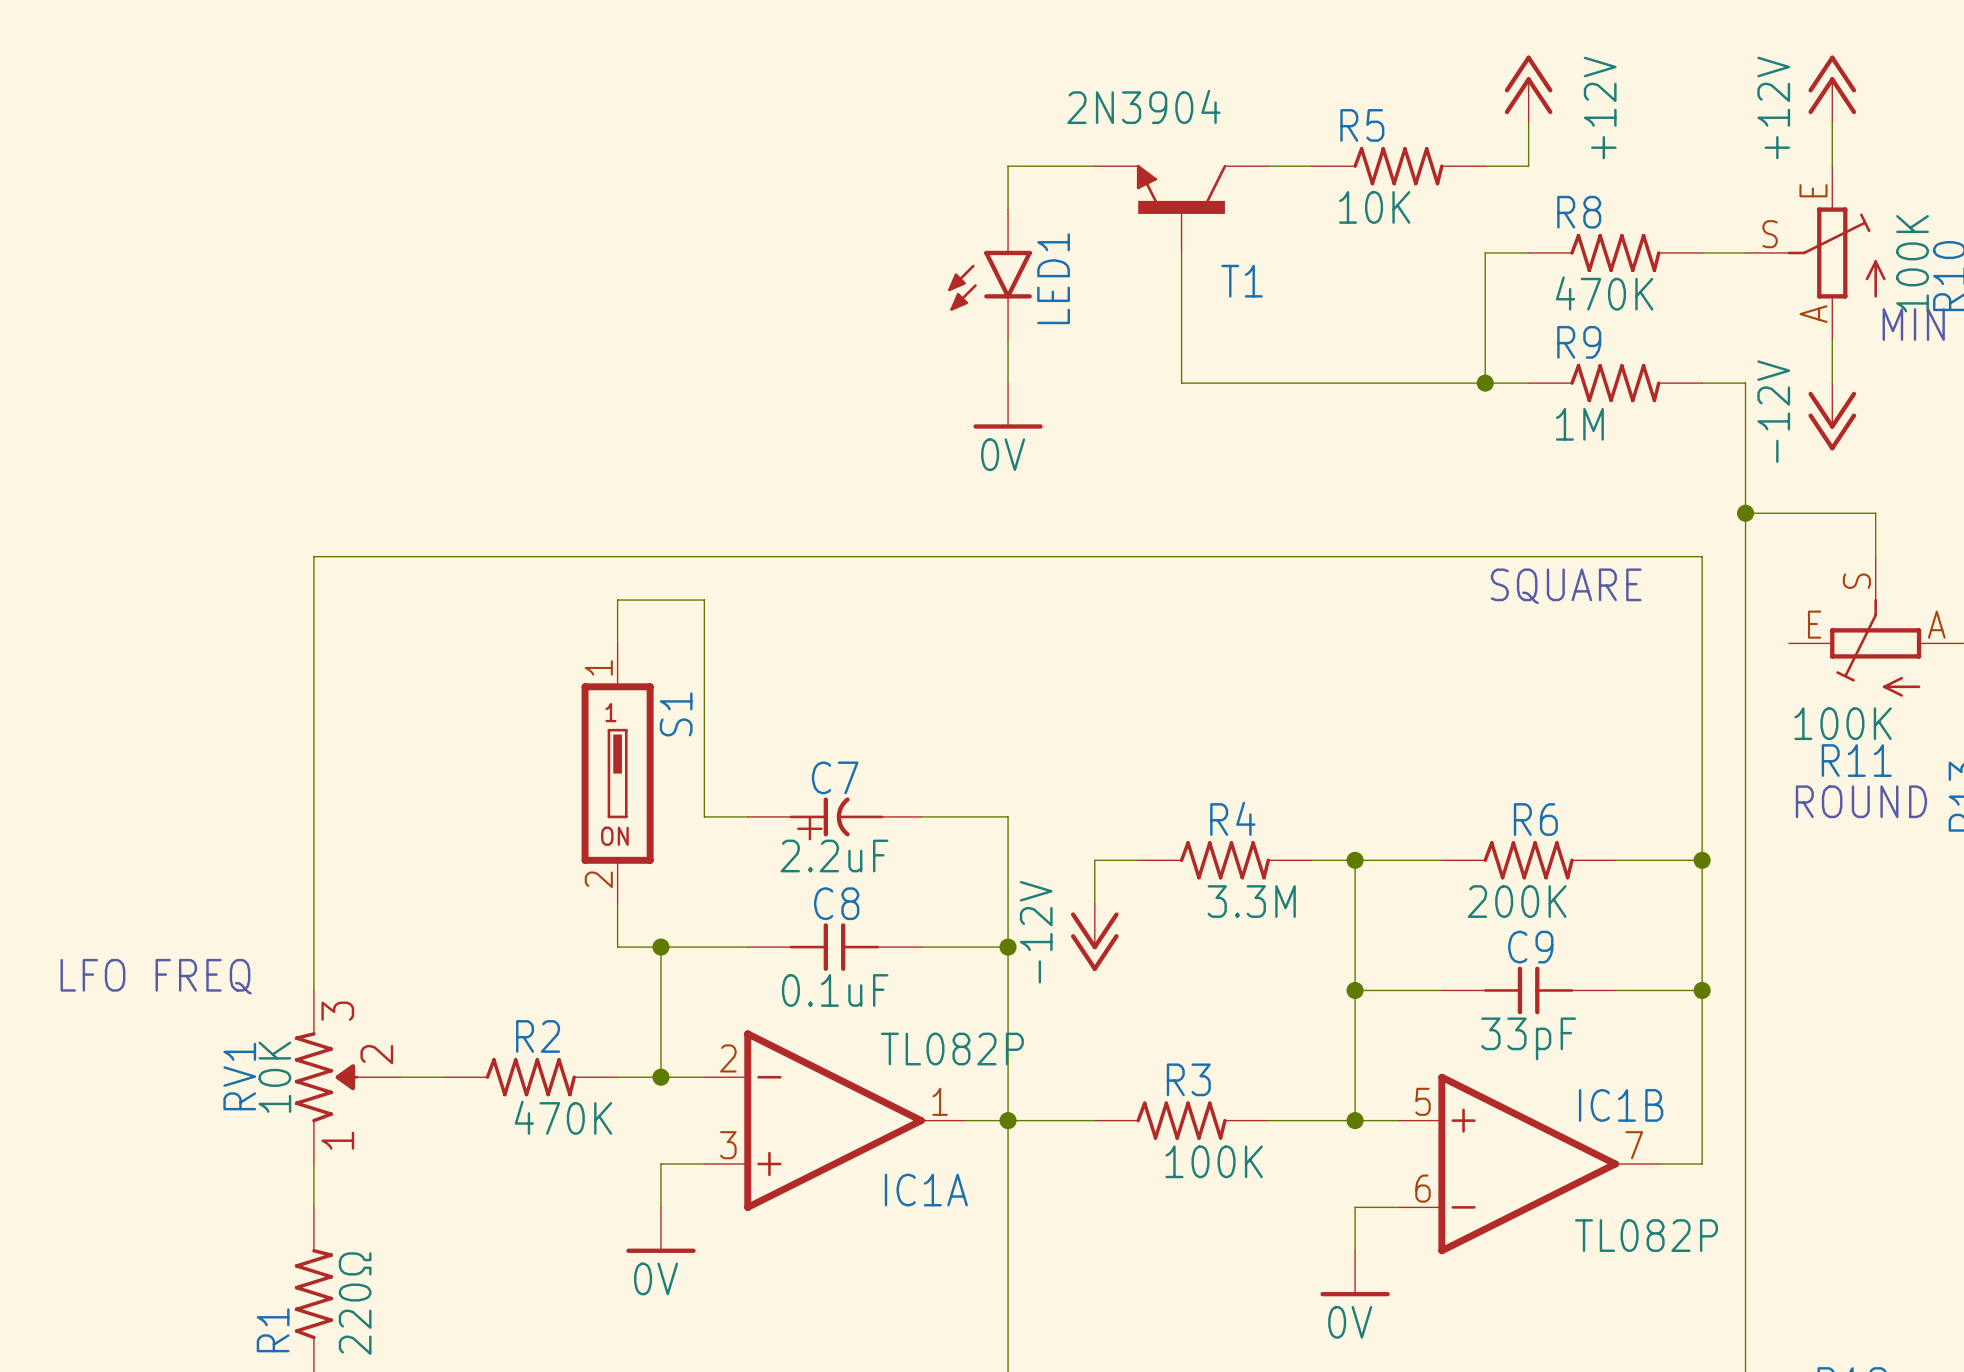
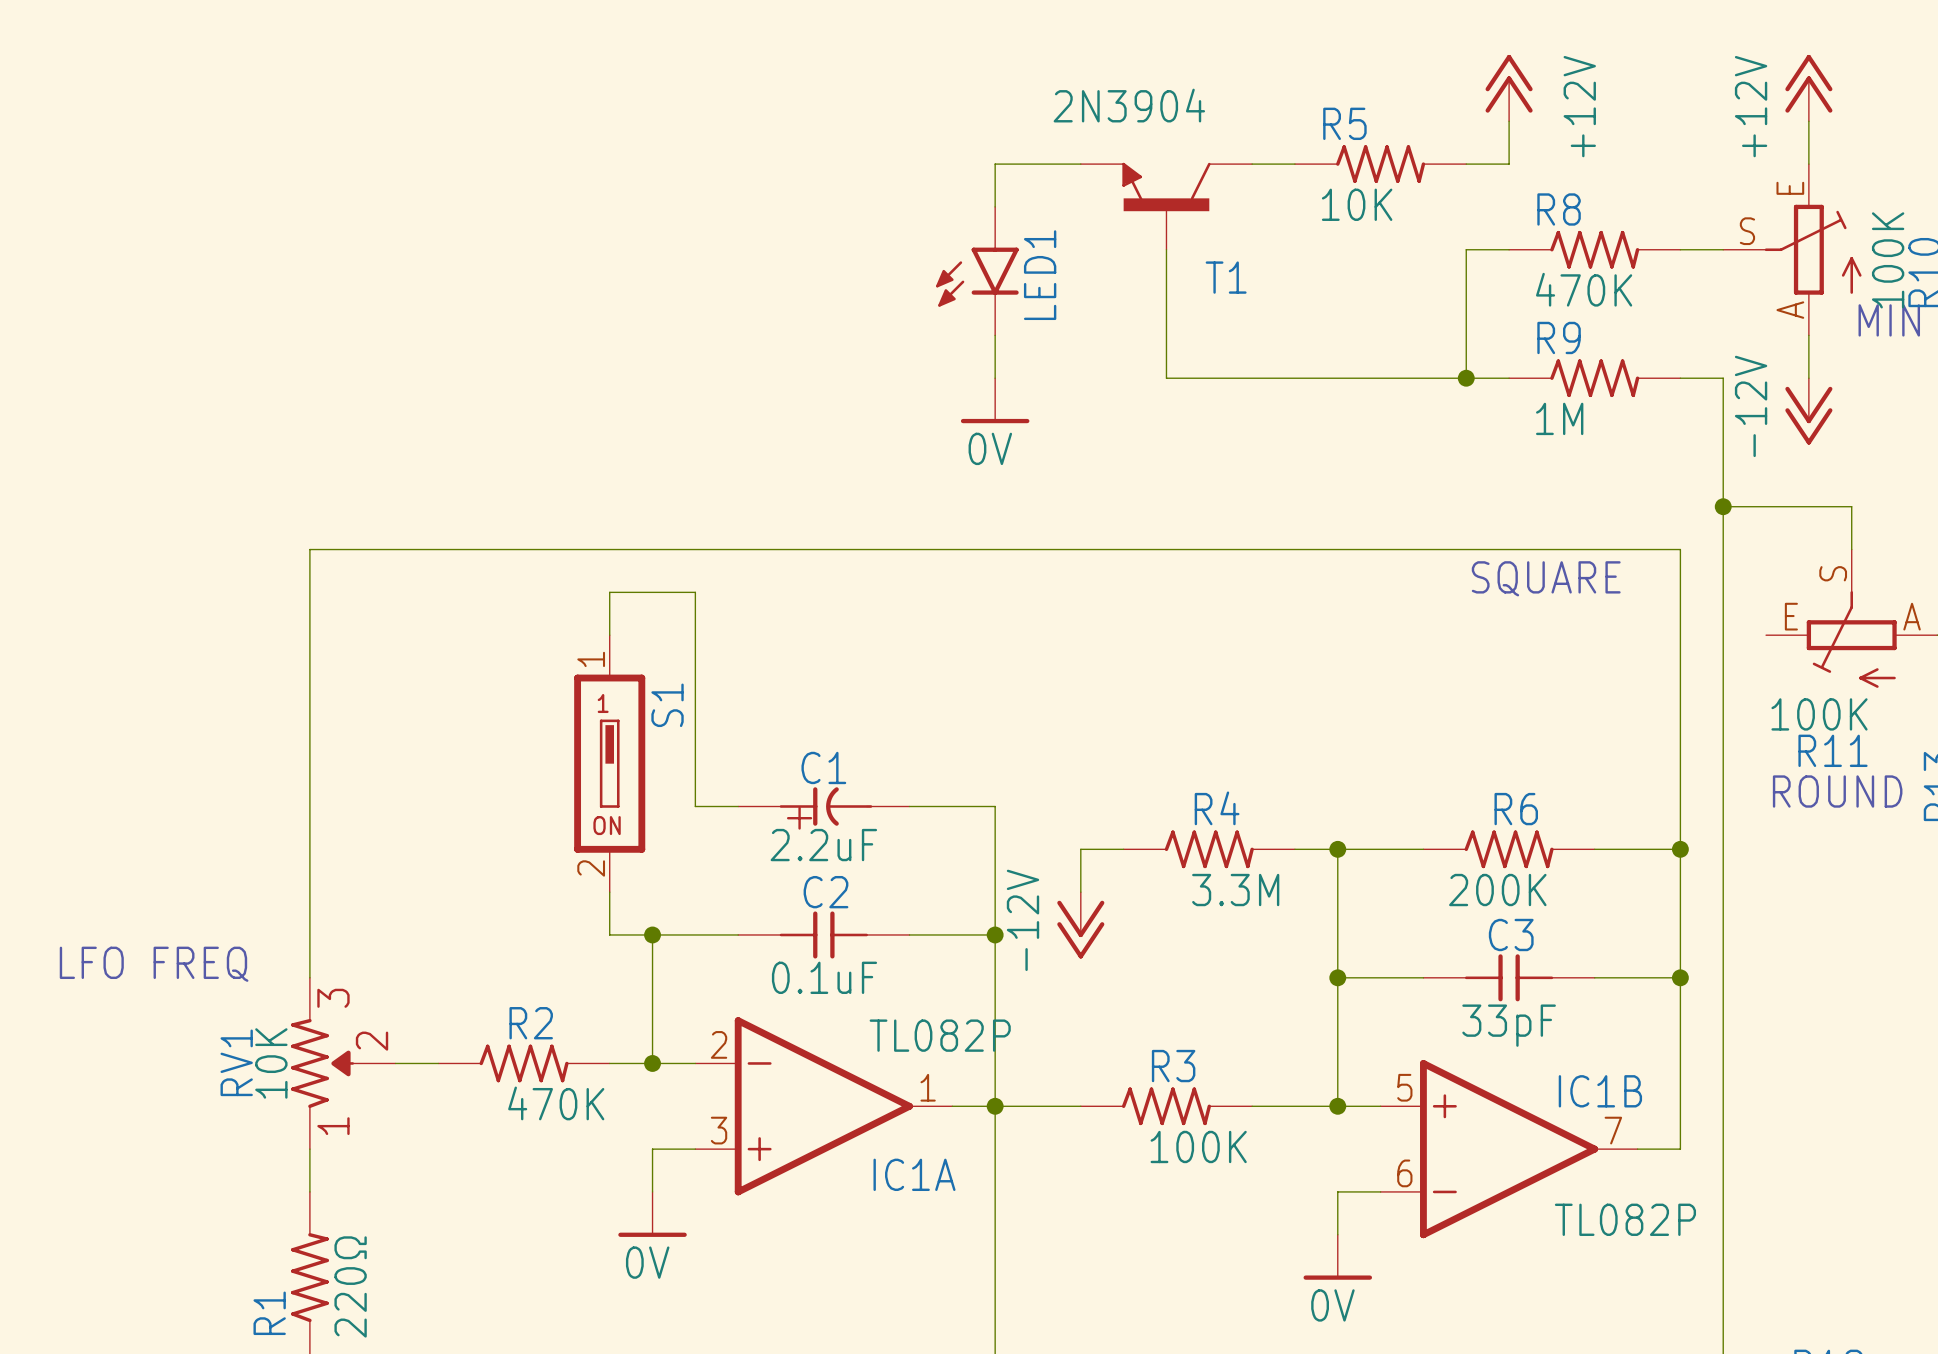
C7 name: C7 (835, 777) -> C1 (823, 767)
C8 name: C8 (836, 903) -> C2 (825, 892)
C9 name: C9 (1530, 947) -> C3 (1511, 934)

